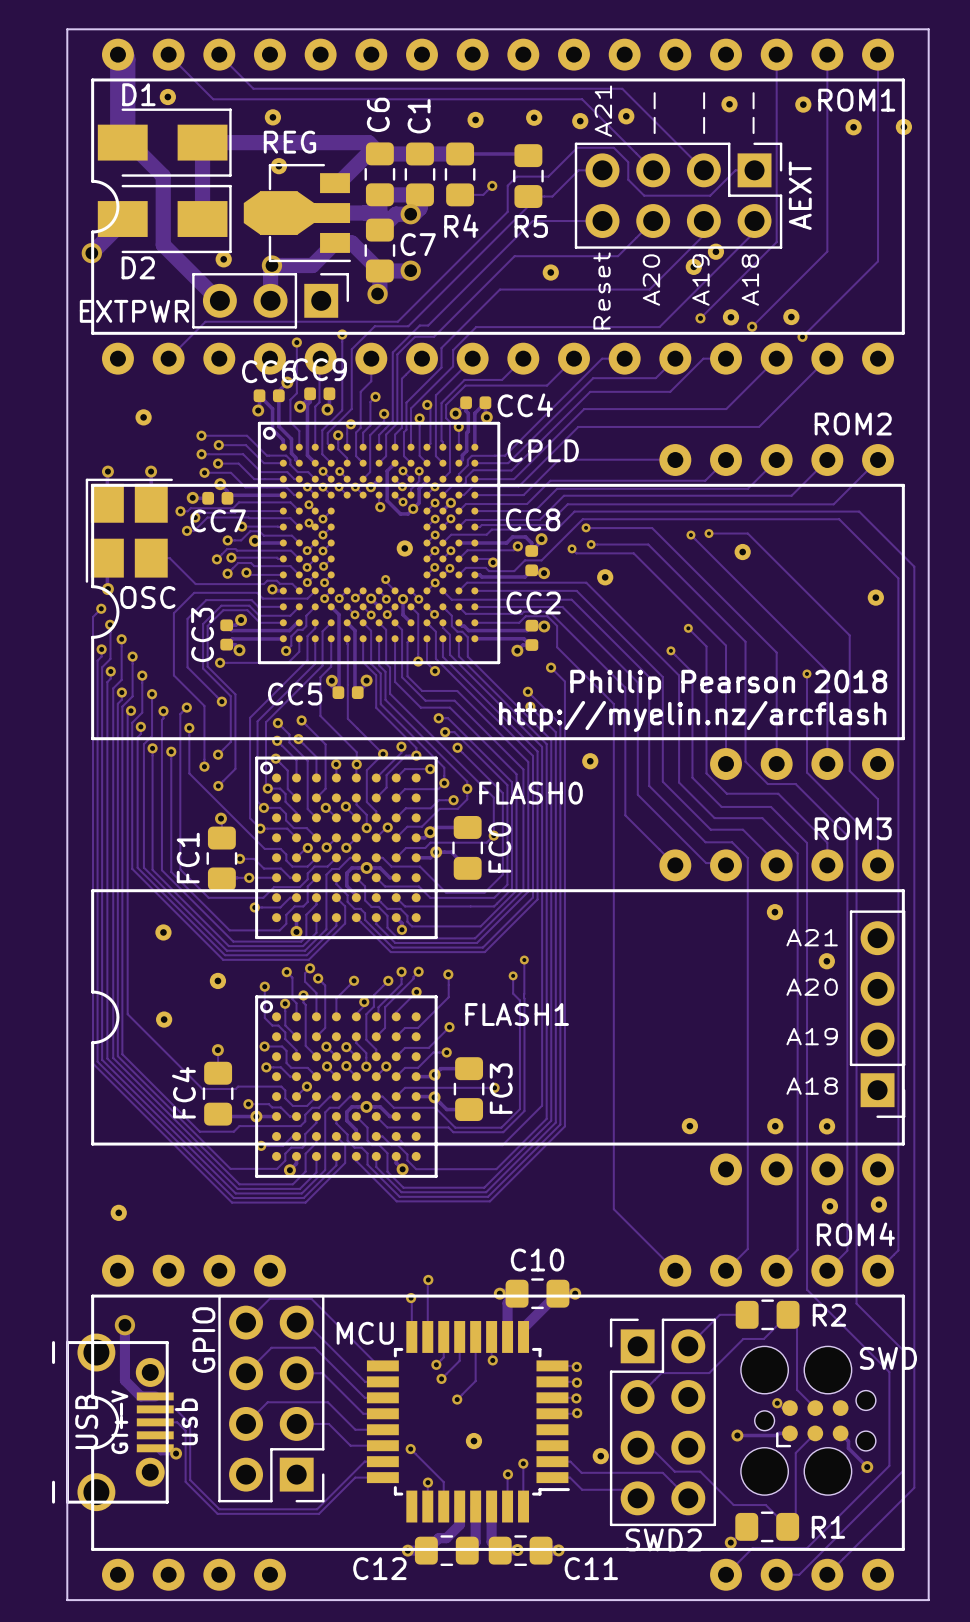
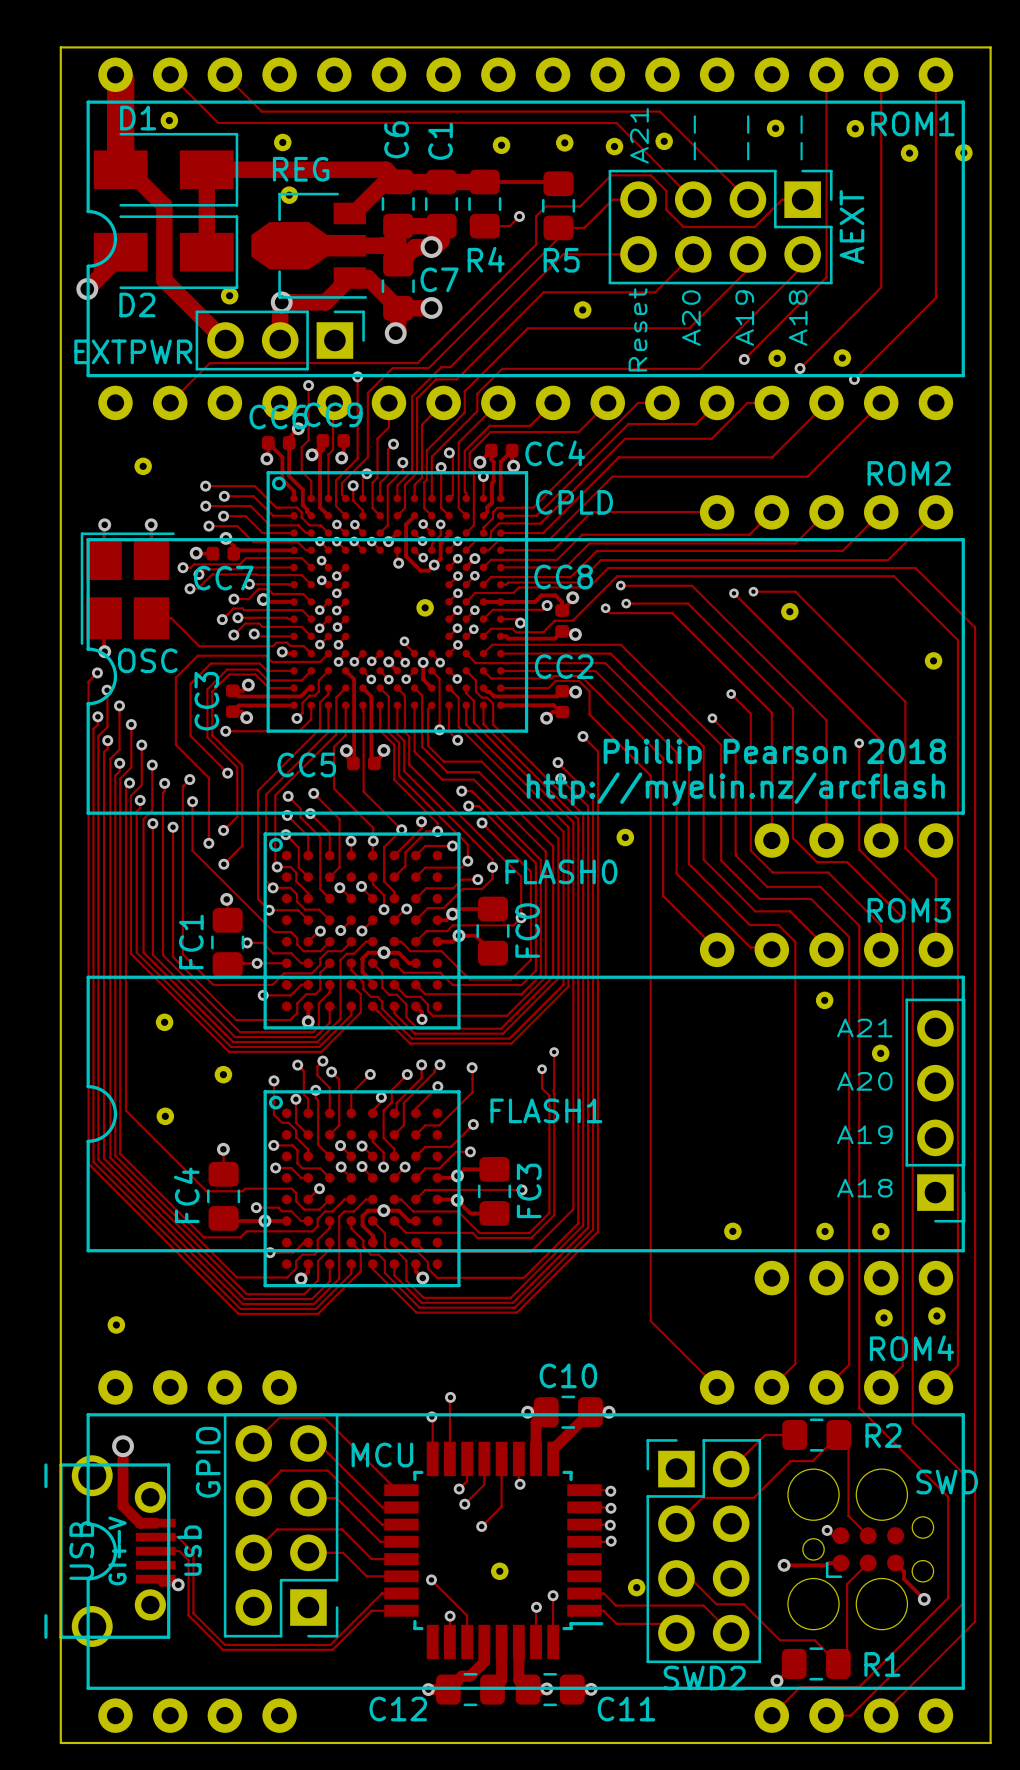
part: (715, 251) -> none
part: (693, 266) -> none
part: (605, 577) -> none

